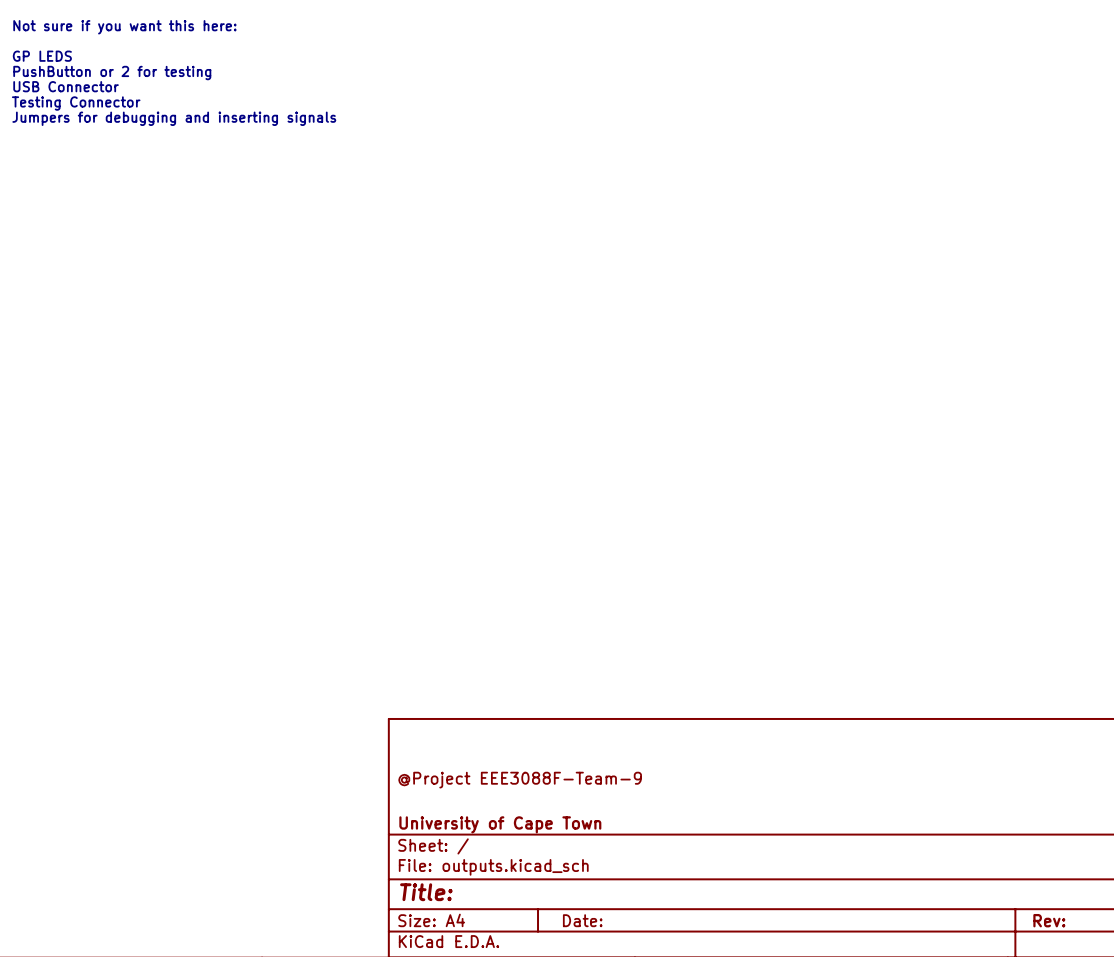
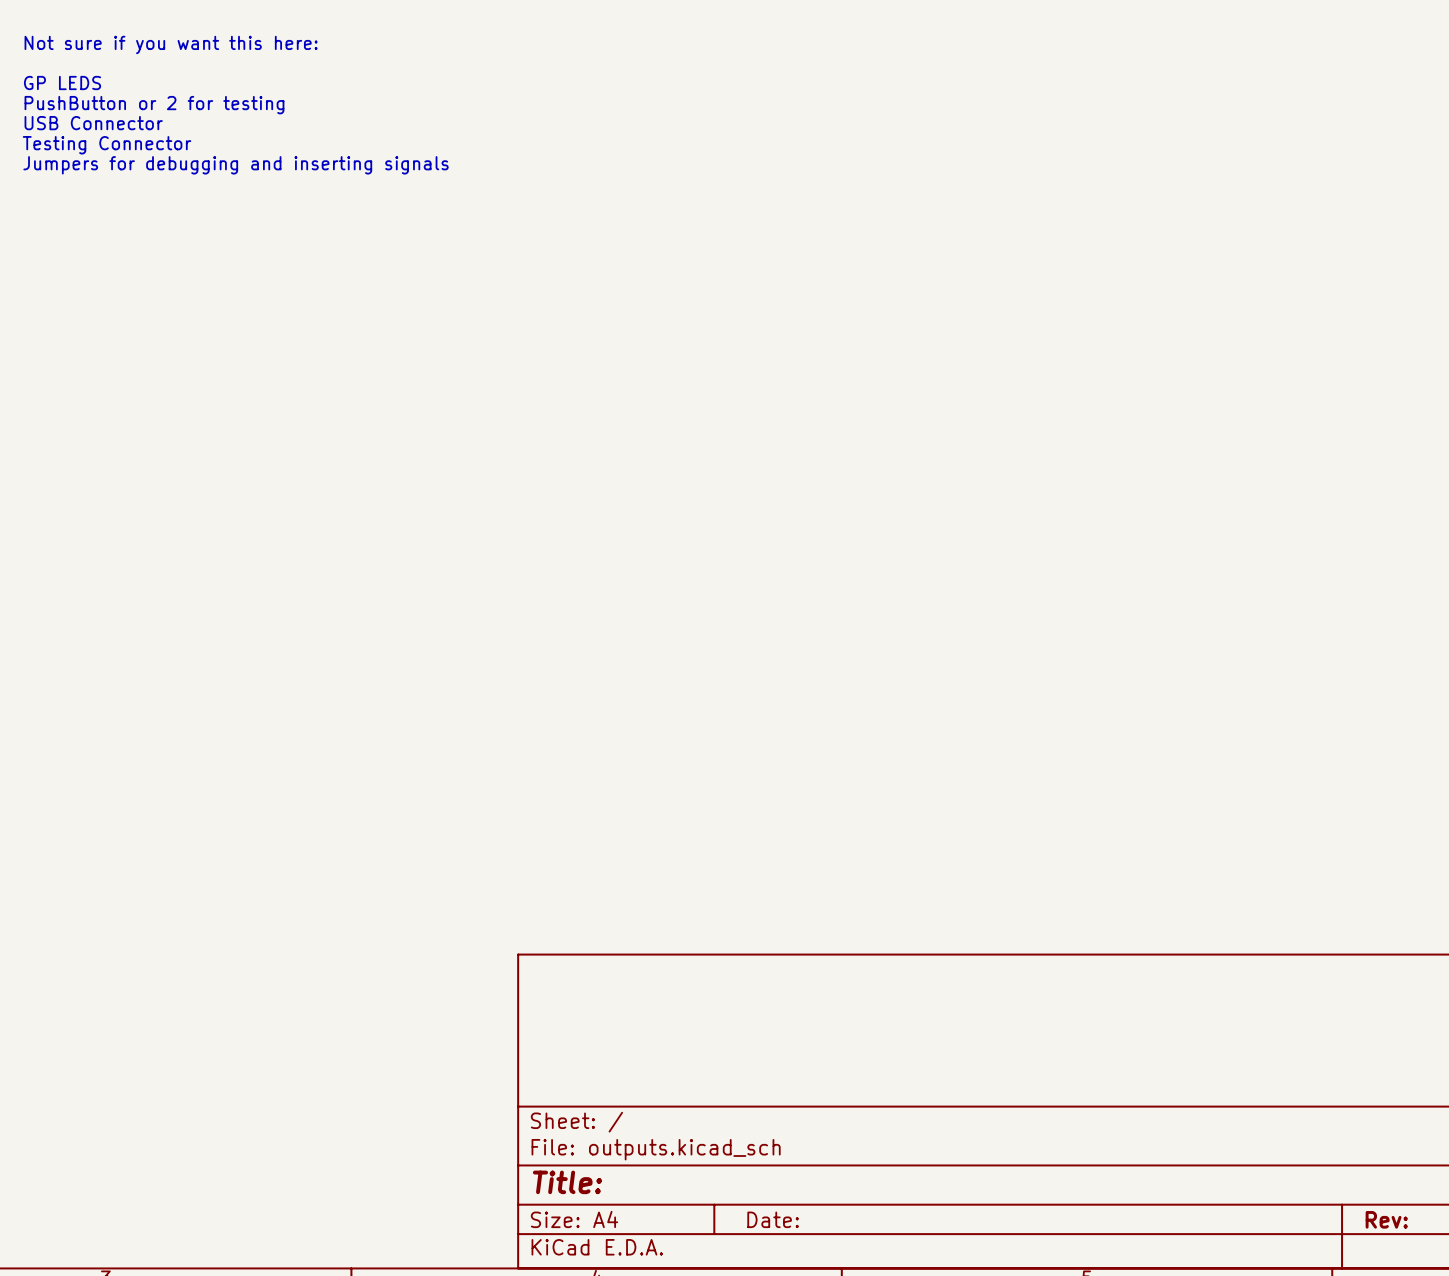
title block: @Project EEE3088F-Team-9 (520, 780) -> none
title block: University of Cape Town (500, 824) -> none

